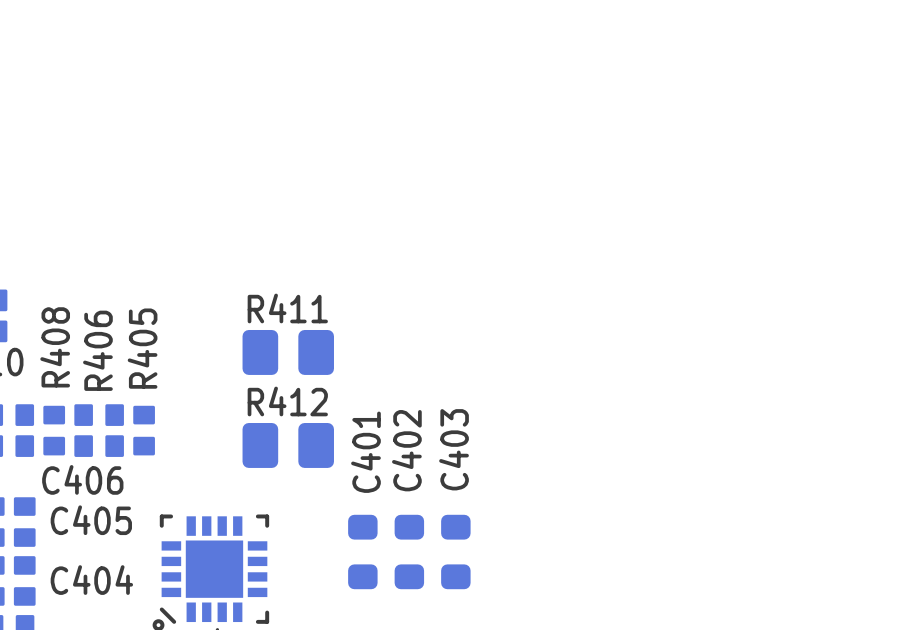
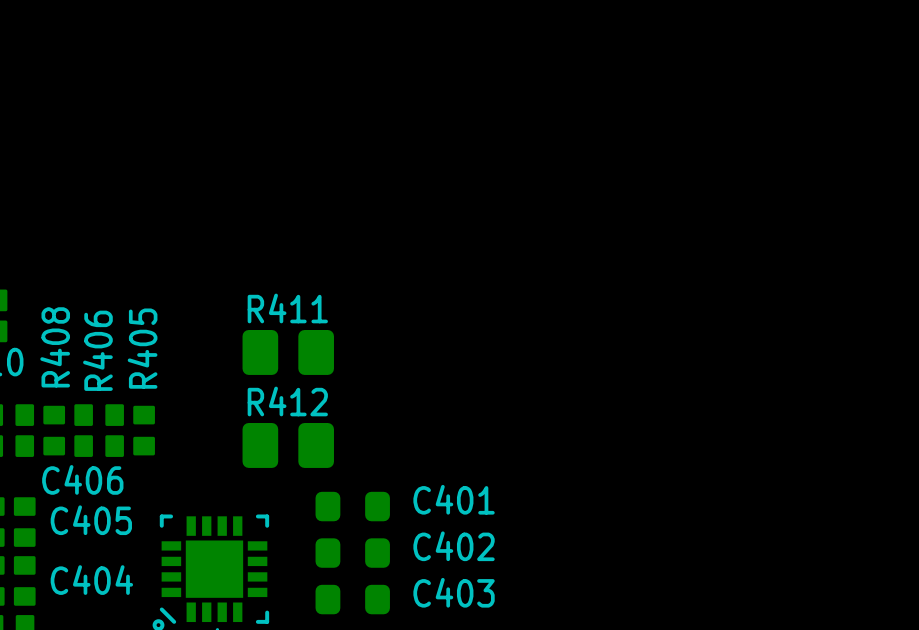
C401 rotation: 0° (362, 551) -> 90° clockwise (352, 506)
C401 position: (362, 551) -> (352, 506)
C402 rotation: 0° (409, 551) -> 90° clockwise (352, 553)
C402 position: (409, 551) -> (352, 553)
C403 rotation: 0° (455, 551) -> 90° clockwise (352, 599)
C403 position: (455, 551) -> (352, 599)

